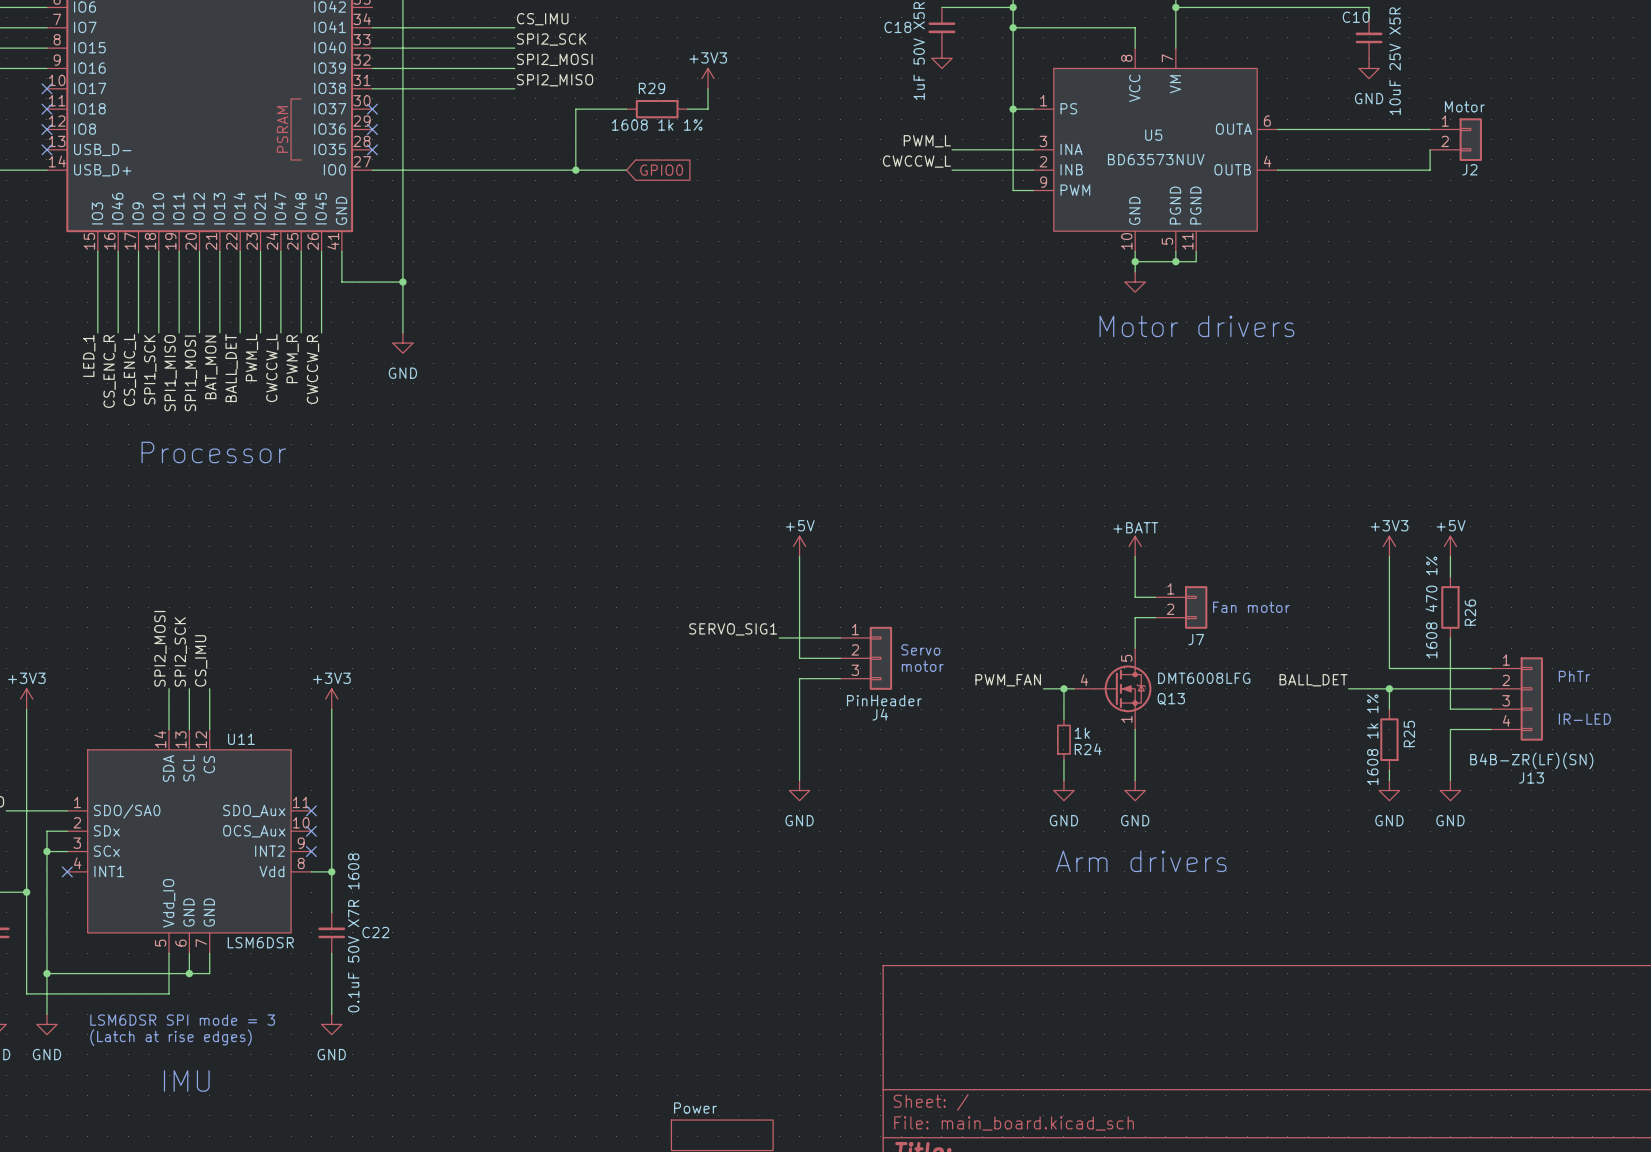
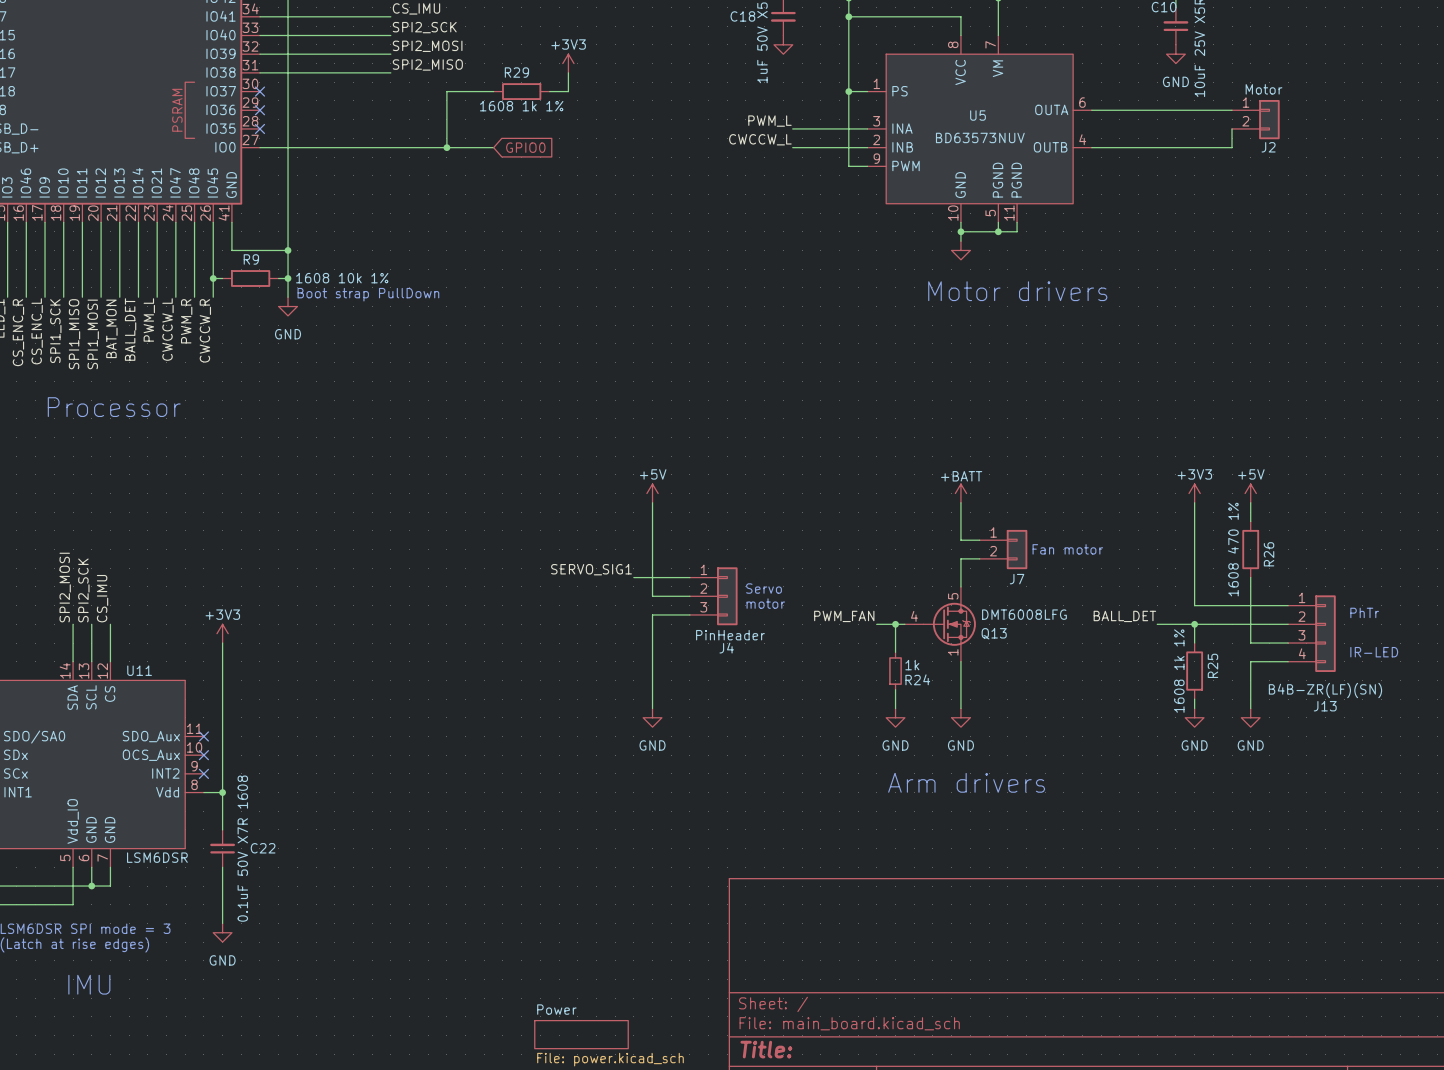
wire: none -> (213, 278) (222, 278)
junction: none -> (213, 278)
R9: none -> (250, 278)
wire: none -> (278, 278) (288, 278)
junction: none -> (288, 278)
text: none -> Boot strap PullDown (368, 294)

